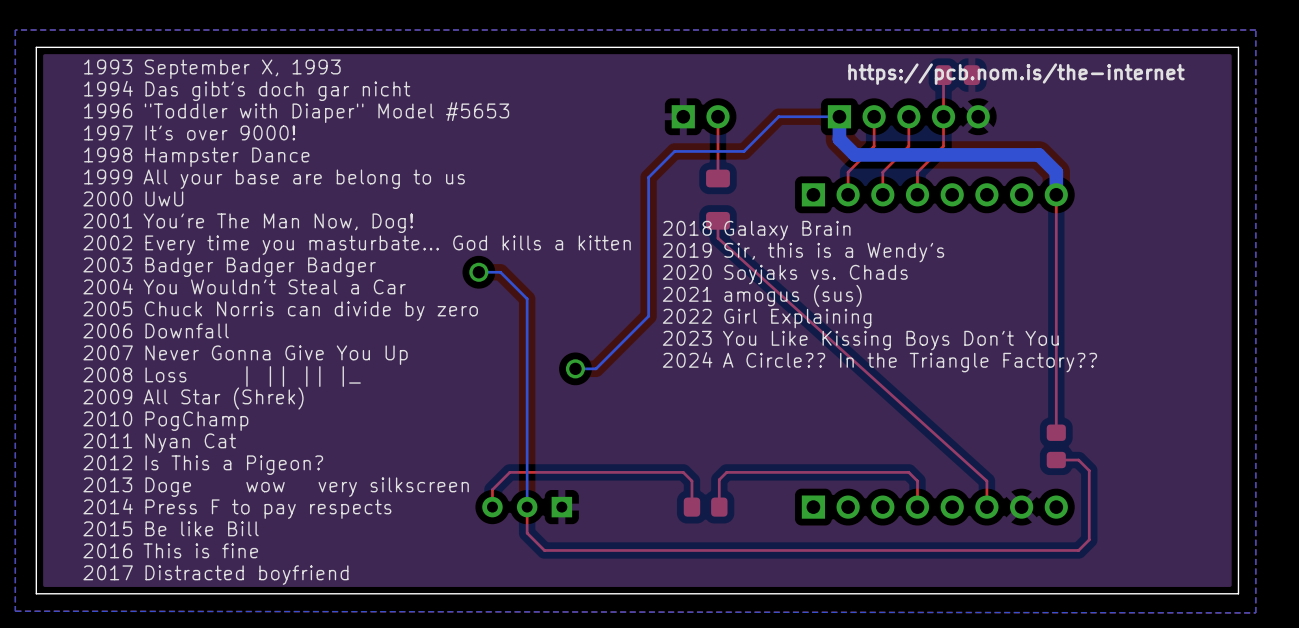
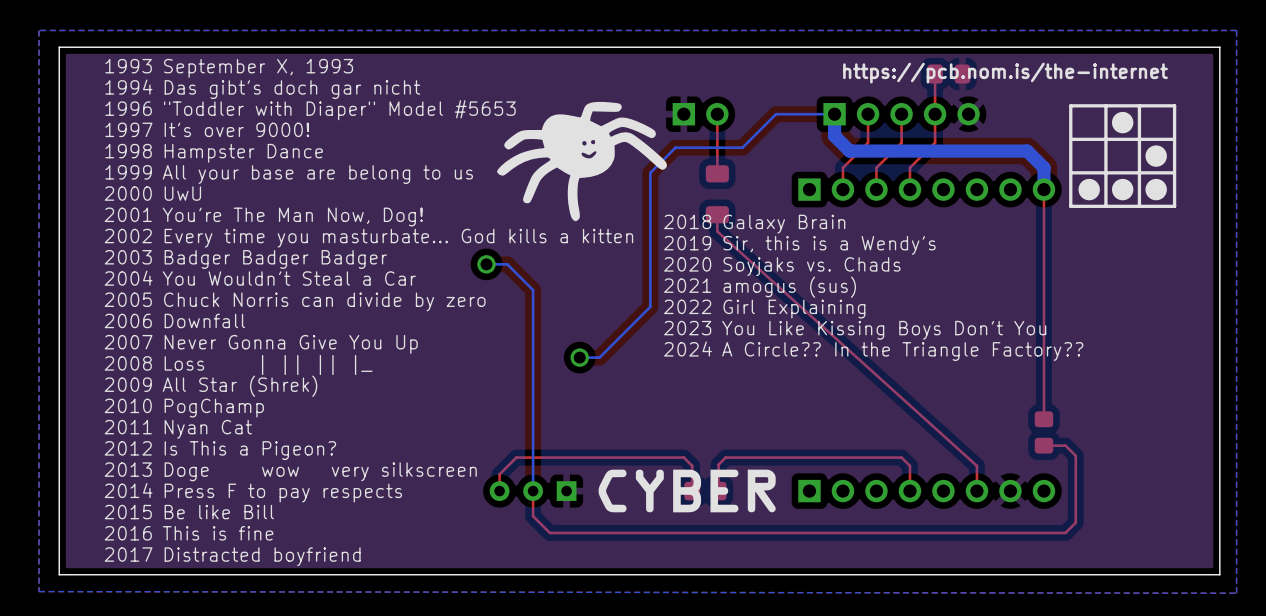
drawing: none -> [497, 101, 668, 222]
line: none -> (1105, 105) (1105, 206)
line: none -> (1139, 105) (1139, 206)
line: none -> (1174, 105) (1070, 105) (1070, 206) (1174, 206) (1174, 105)
drawing: none -> [1111, 111, 1134, 134]
line: none -> (1172, 139) (1072, 139)
drawing: none -> [1078, 145, 1167, 201]
line: none -> (1172, 172) (1072, 172)
drawing: none -> [598, 469, 776, 513]

